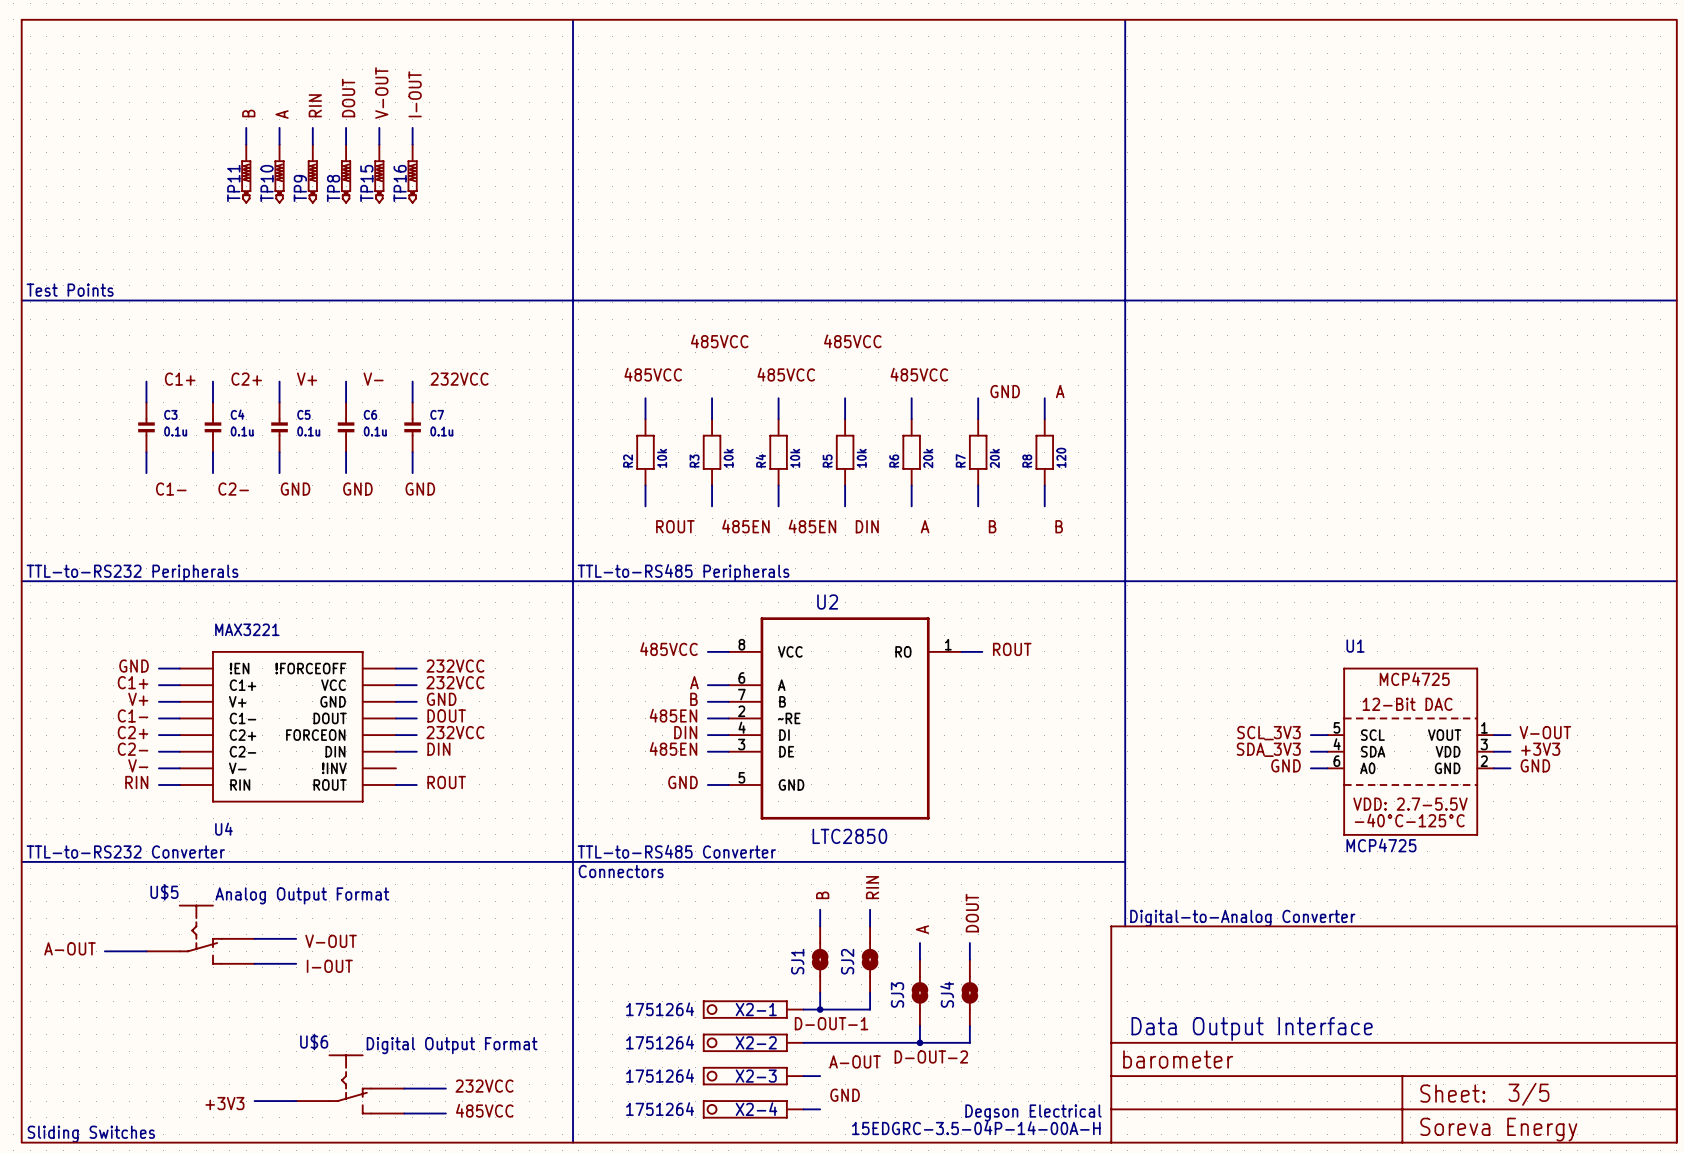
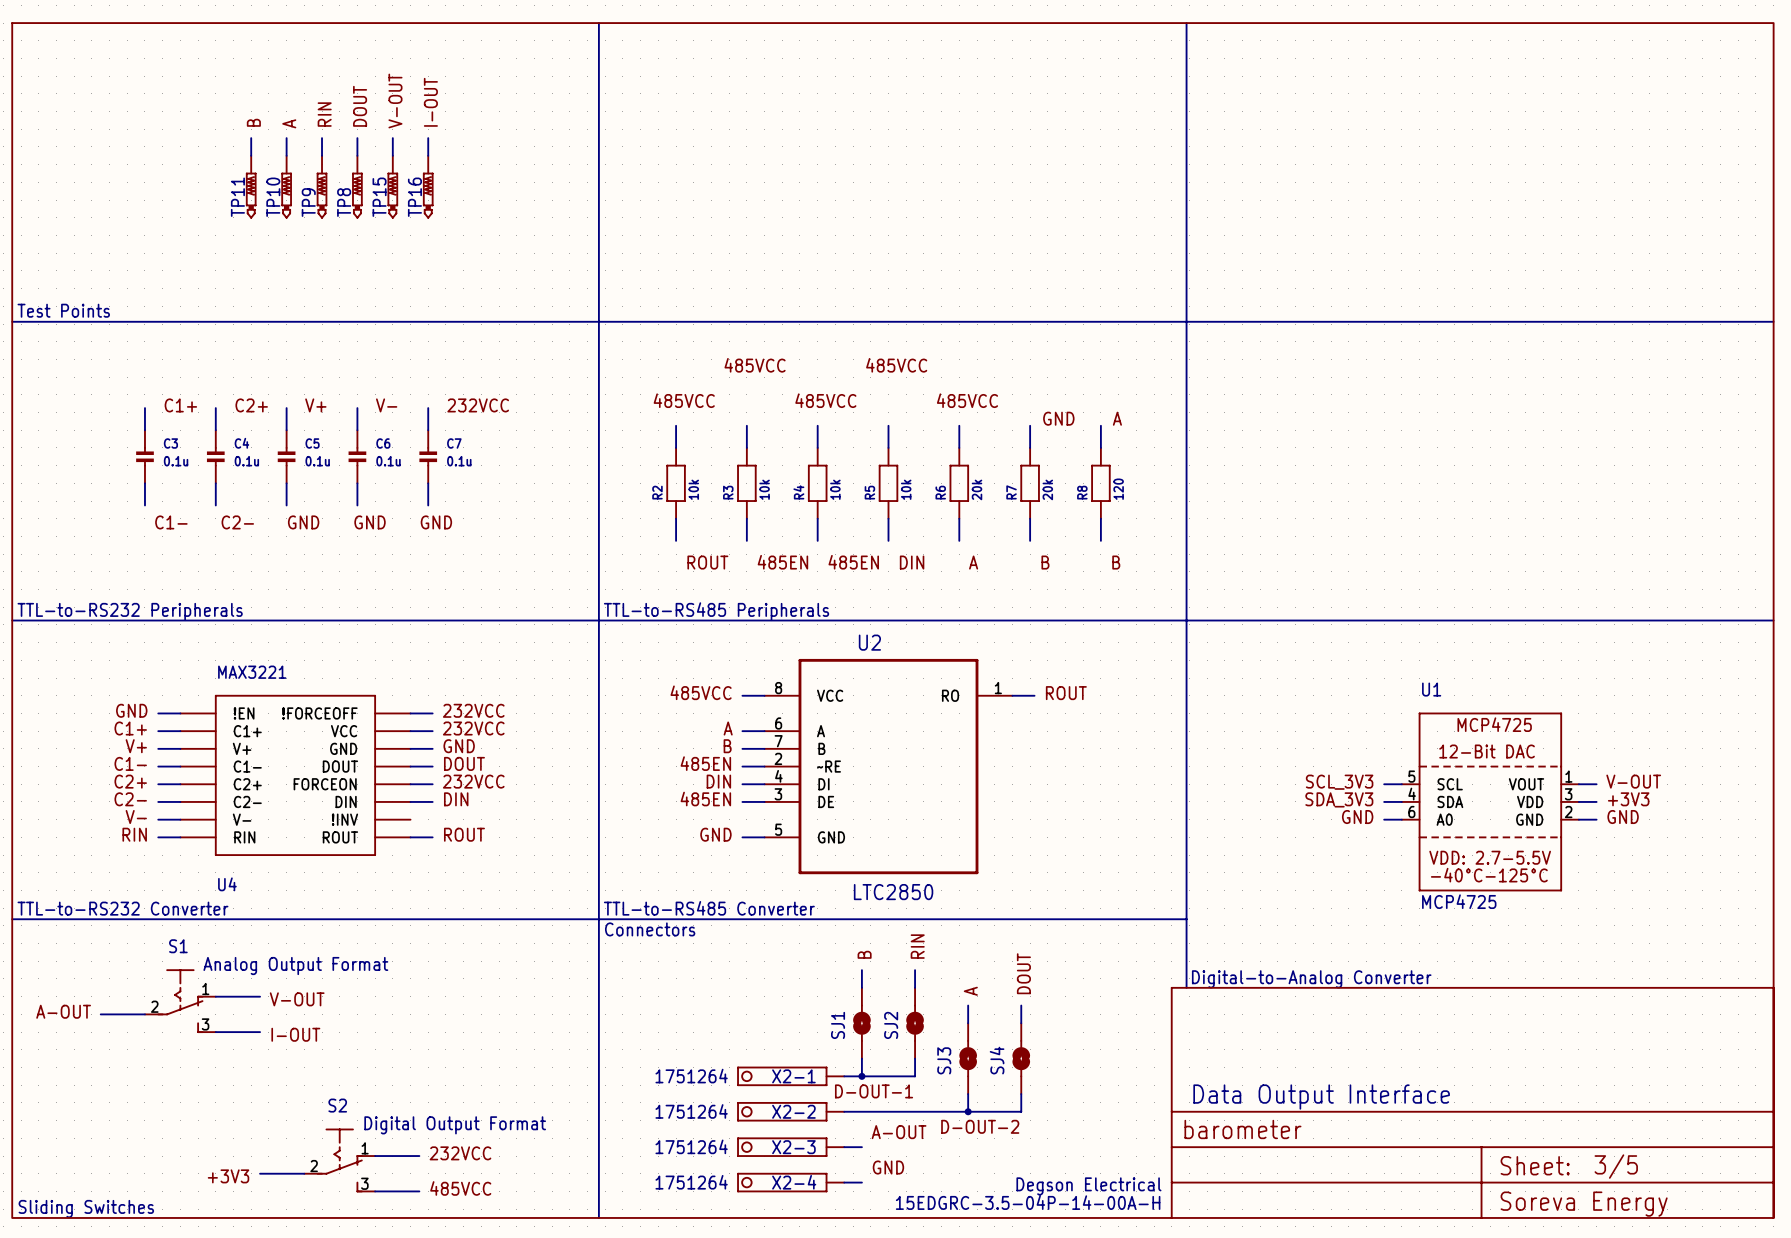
U$5: Analog Output Format (200, 934) -> none
S1: none -> Analog Output Format (180, 1001)
wire: (254, 938) (296, 938) -> (215, 996) (260, 996)
label position: V-OUT (331, 941) -> V-OUT (297, 999)
wire: (254, 963) (296, 963) -> (215, 1032) (260, 1032)
label position: I-OUT (329, 966) -> I-OUT (295, 1034)
U$6: Digital Output Format (350, 1084) -> none
label position: 232VCC (484, 1086) -> 232VCC (460, 1153)
S2: none -> Digital Output Format (339, 1160)
wire: (404, 1088) (445, 1088) -> (375, 1156) (419, 1156)
label position: 485VCC (484, 1110) -> 485VCC (460, 1188)
wire: (404, 1113) (445, 1113) -> (375, 1191) (419, 1191)

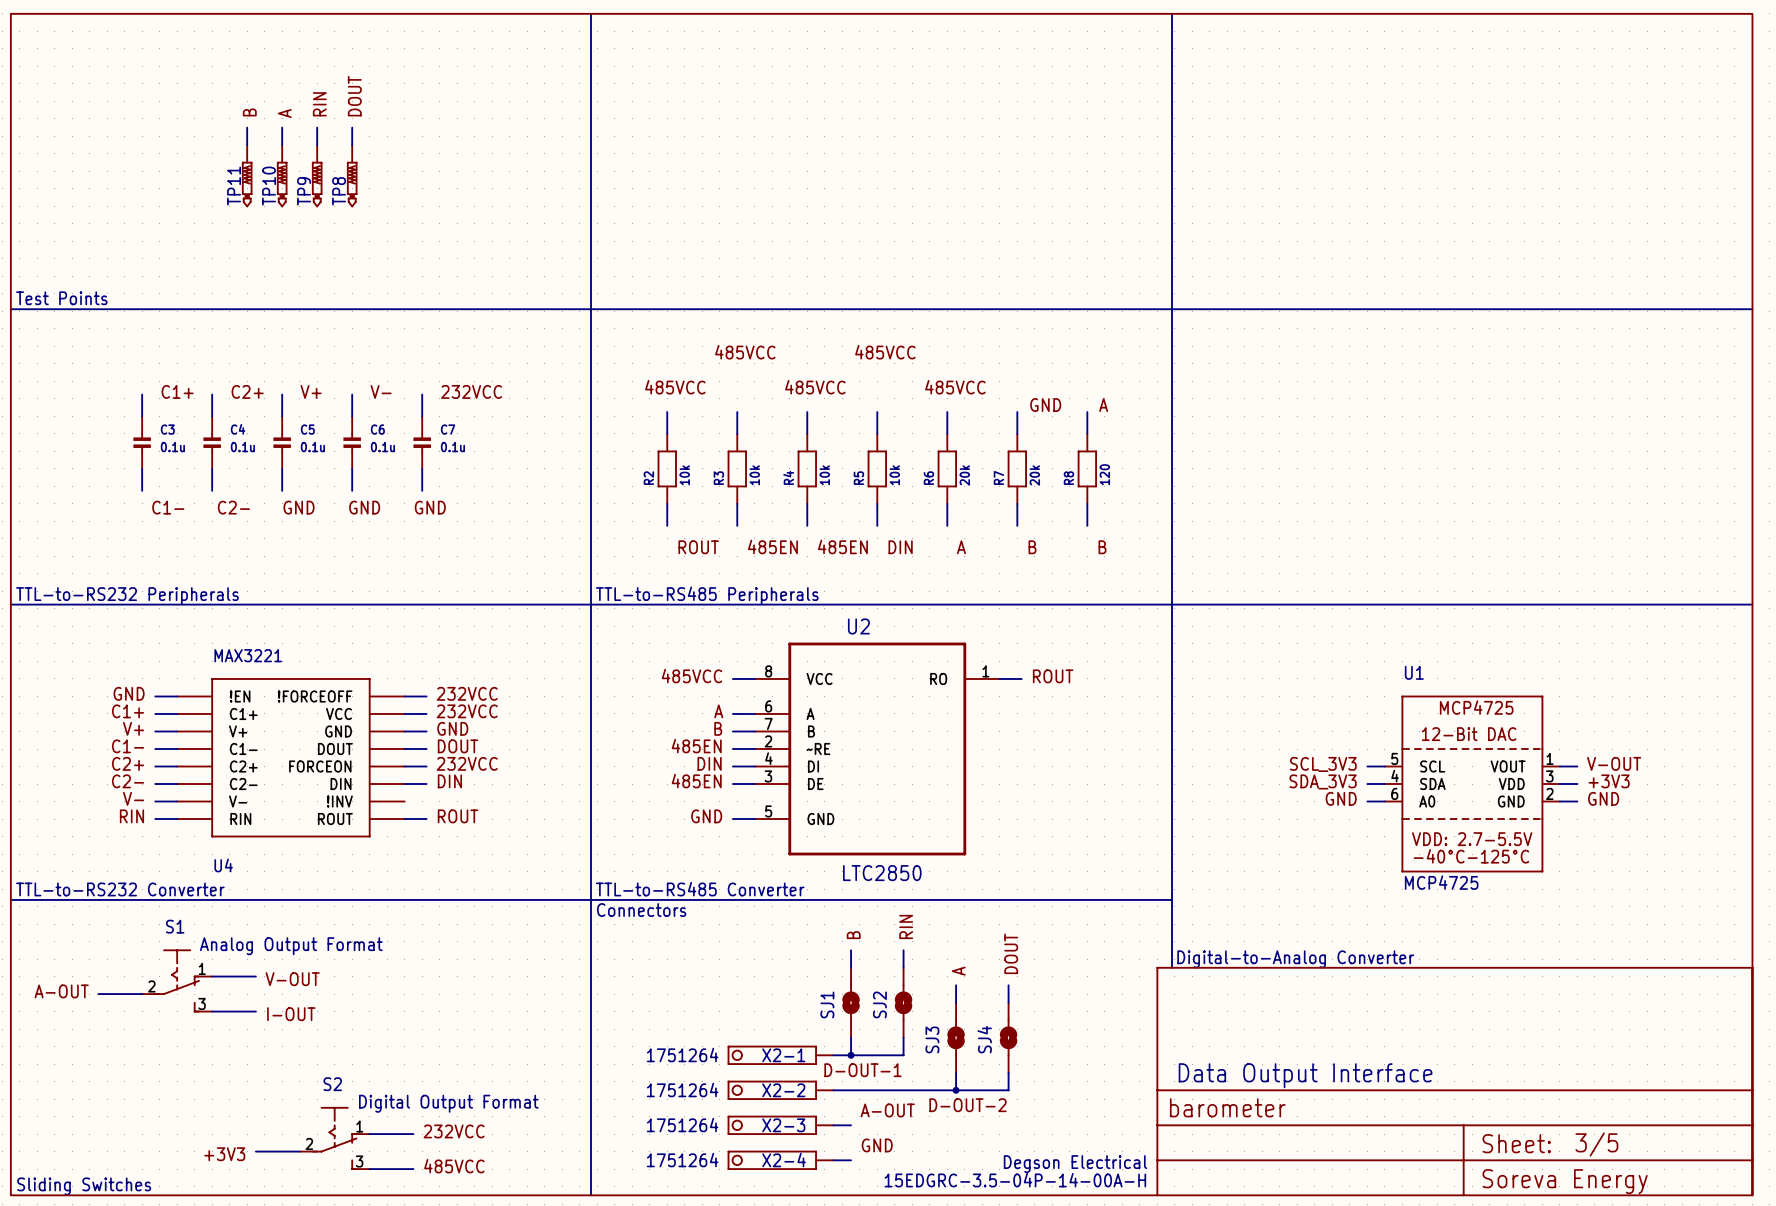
label: V-OUT (395, 101) -> none
label: I-OUT (430, 102) -> none
wire: (392, 138) (392, 155) -> none
wire: (428, 138) (428, 155) -> none
TP15: (392, 187) -> none
TP16: (428, 187) -> none

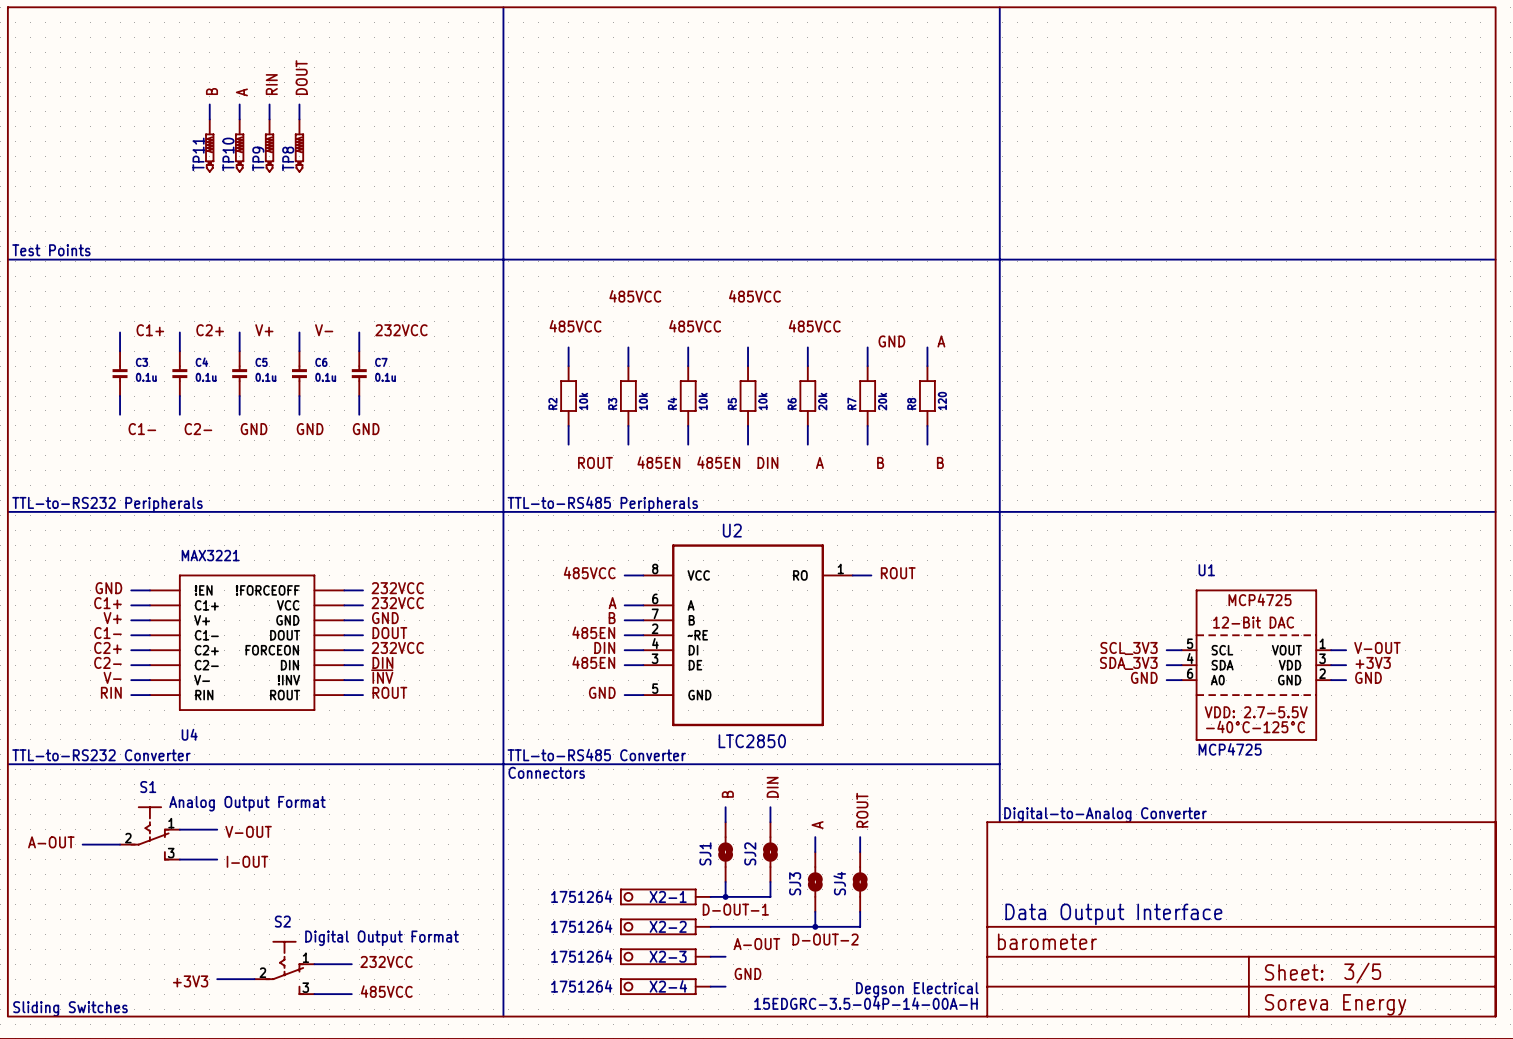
label: none -> ~{INV} (382, 676)
wire: none -> (344, 680) (363, 680)
label: RIN (906, 926) -> DIN (772, 787)
label: DOUT (1011, 953) -> ROUT (862, 810)

